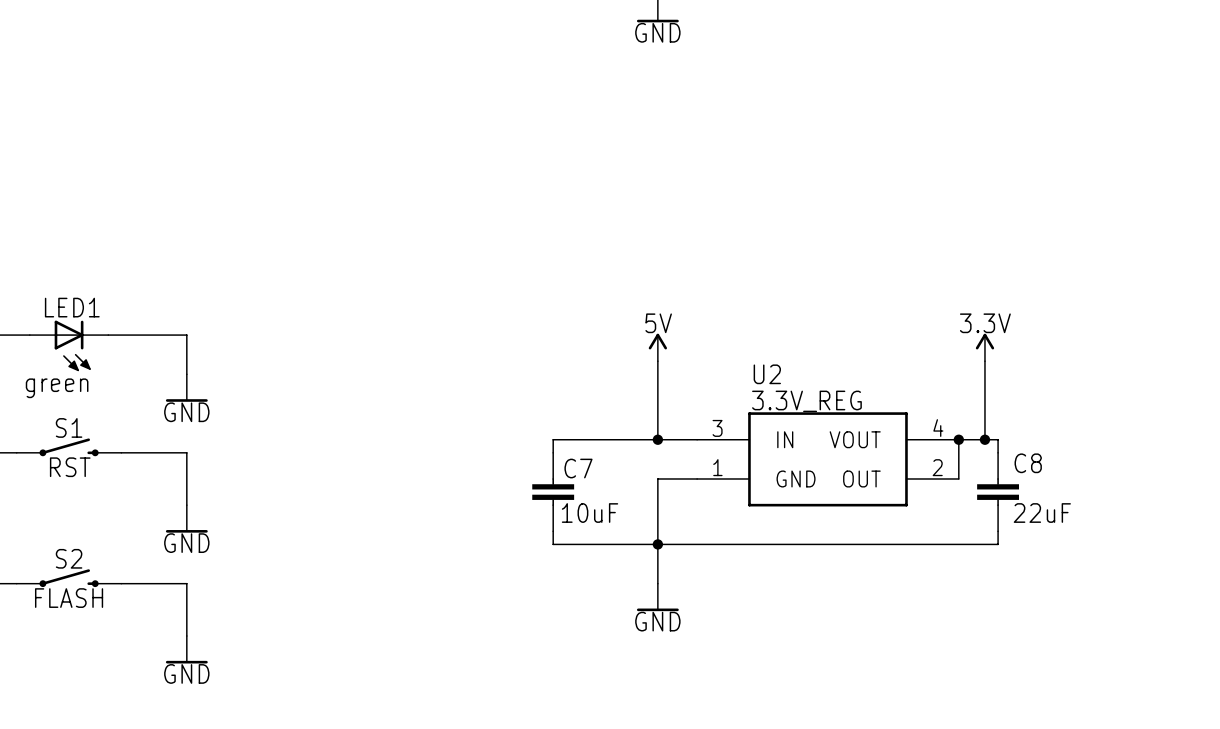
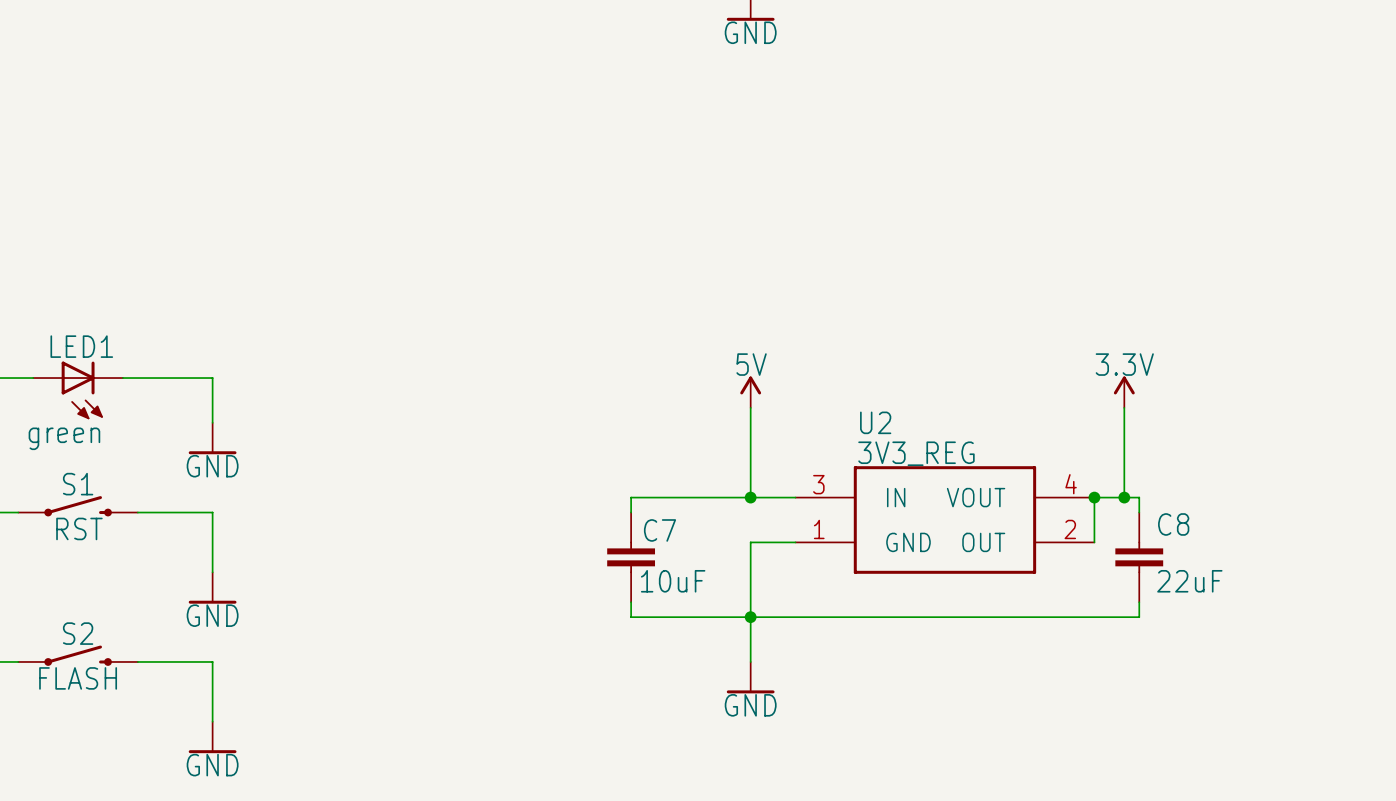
U2 value: 3.3V_REG (806, 401) -> 3V3_REG (916, 453)

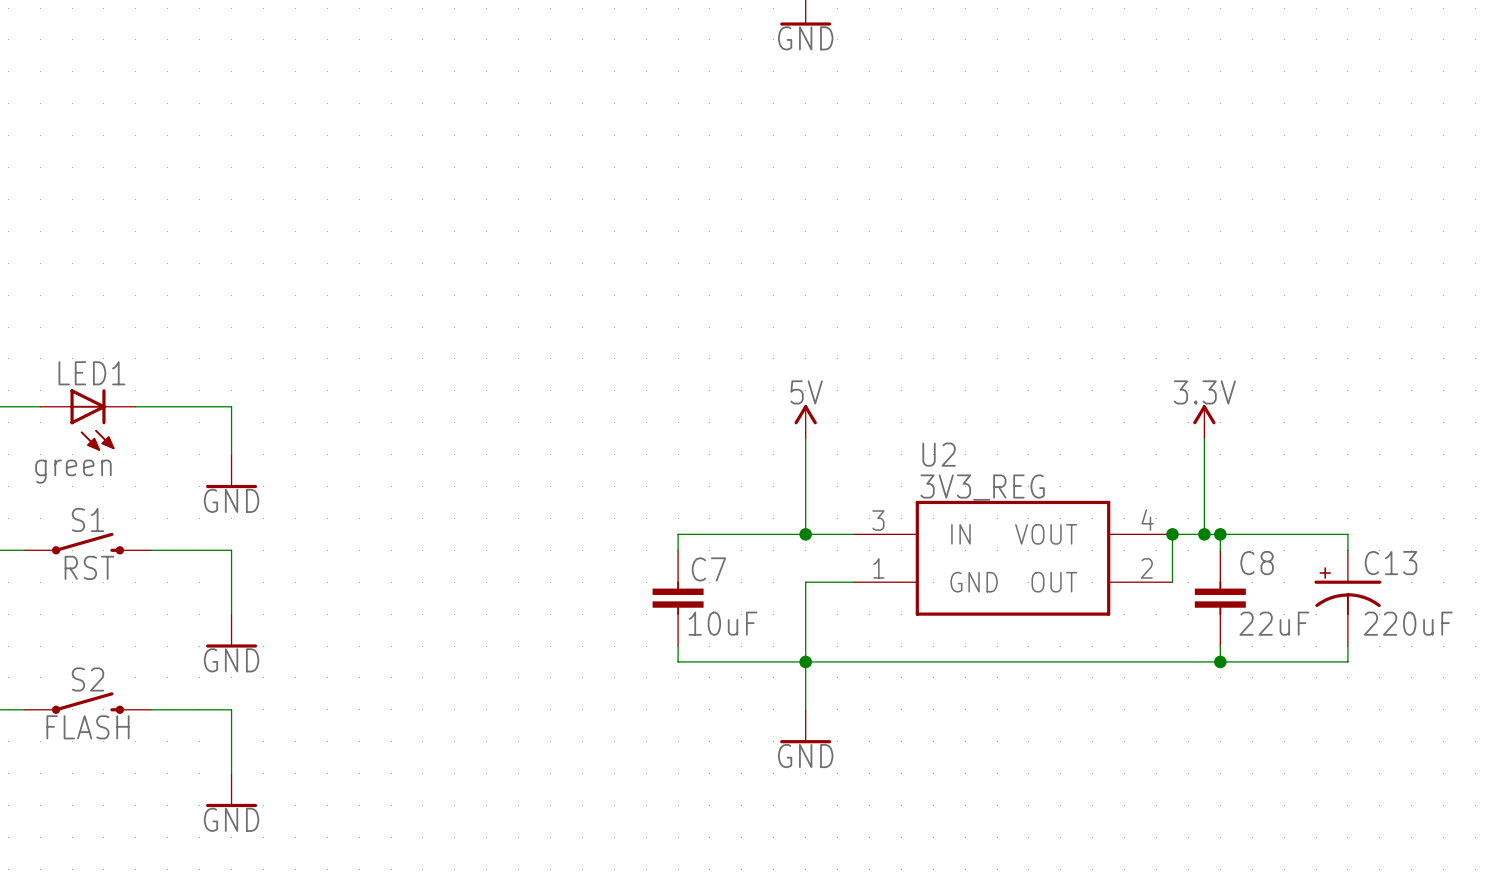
wire: none -> (1220, 534) (1347, 534) (1347, 550)
junction: none -> (1220, 534)
C13: none -> 220uF (1347, 598)
wire: none -> (1347, 646) (1347, 661) (1220, 661)
junction: none -> (1220, 661)

